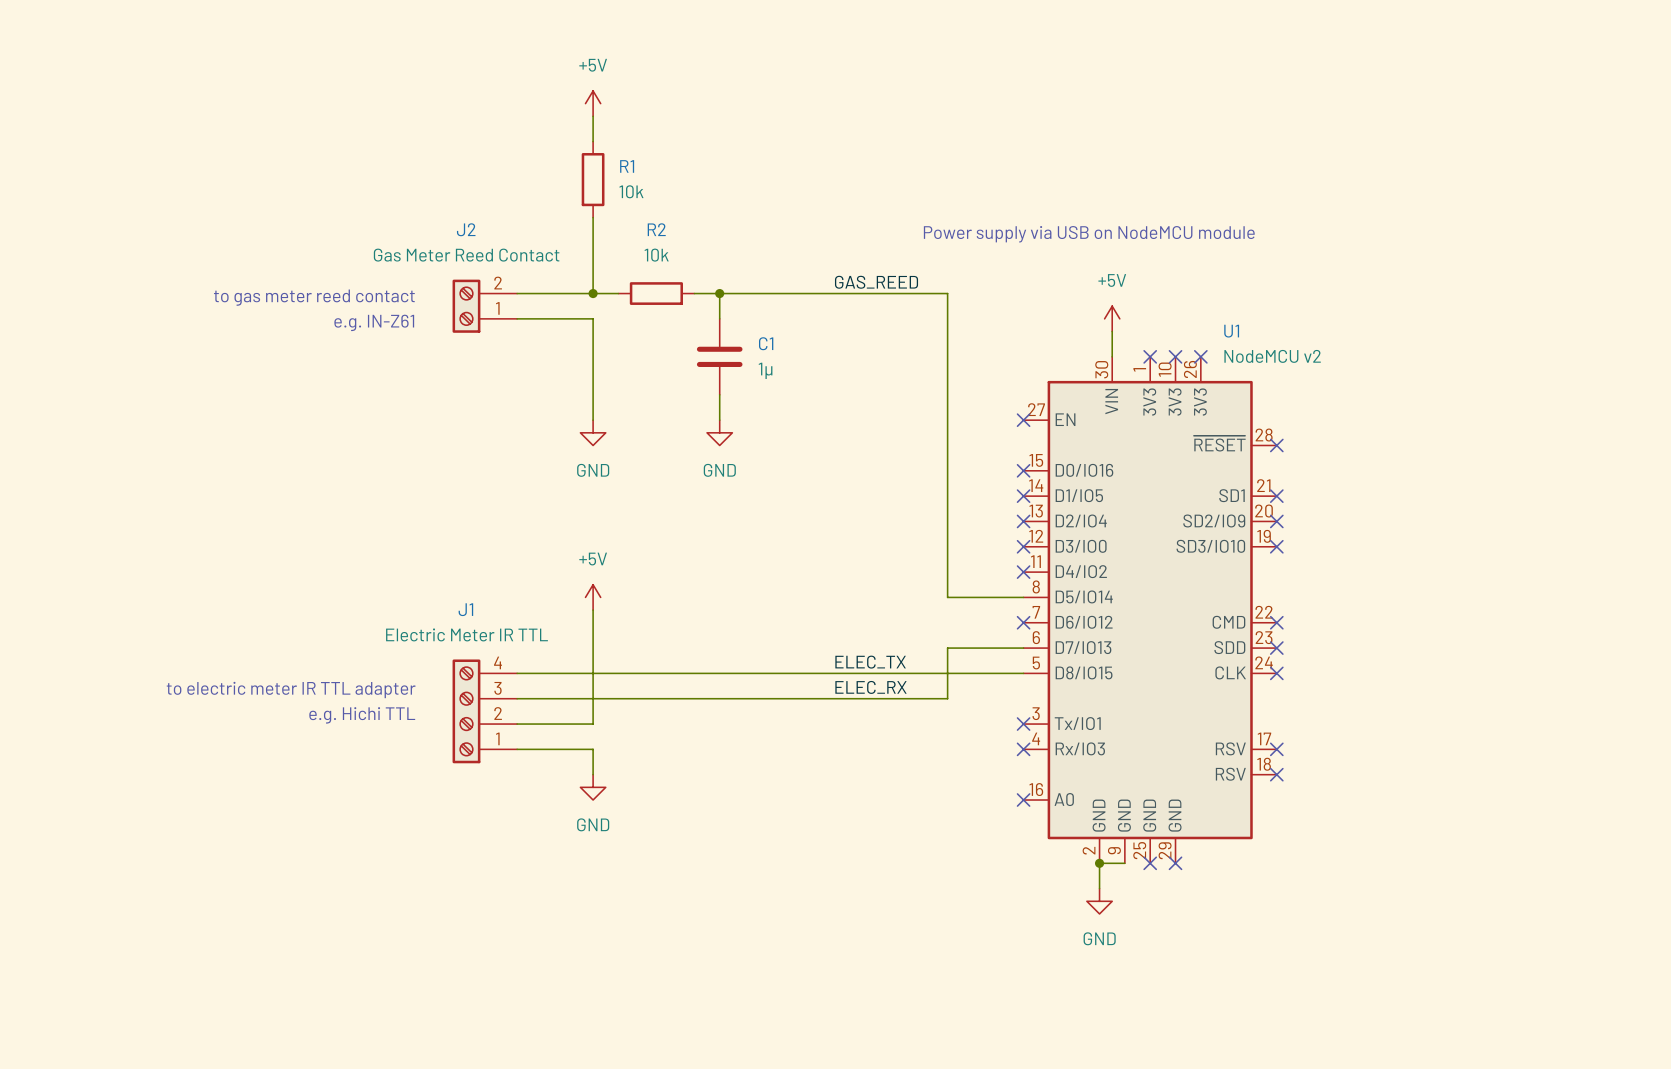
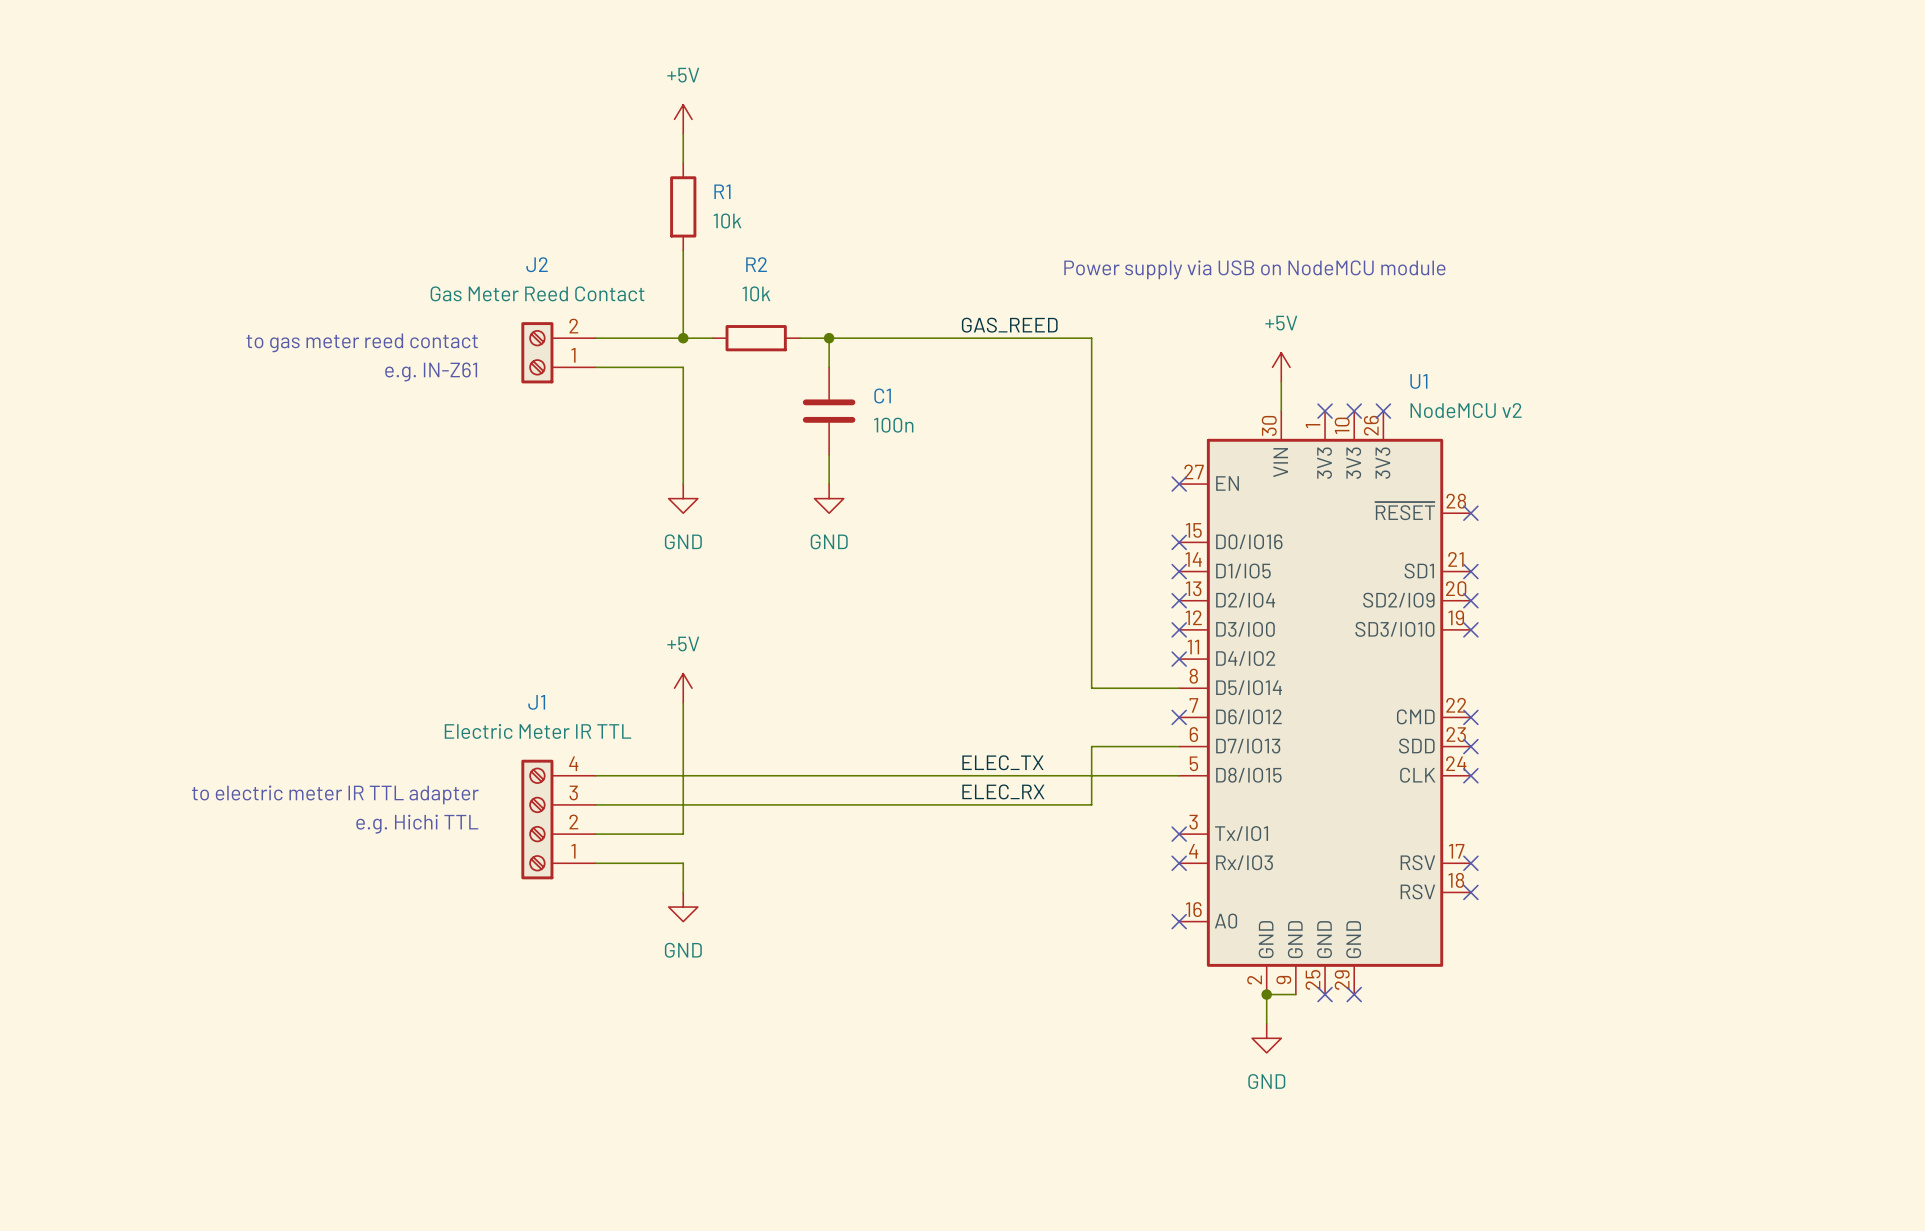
C1 value: 1µ (765, 370) -> 100n (893, 425)

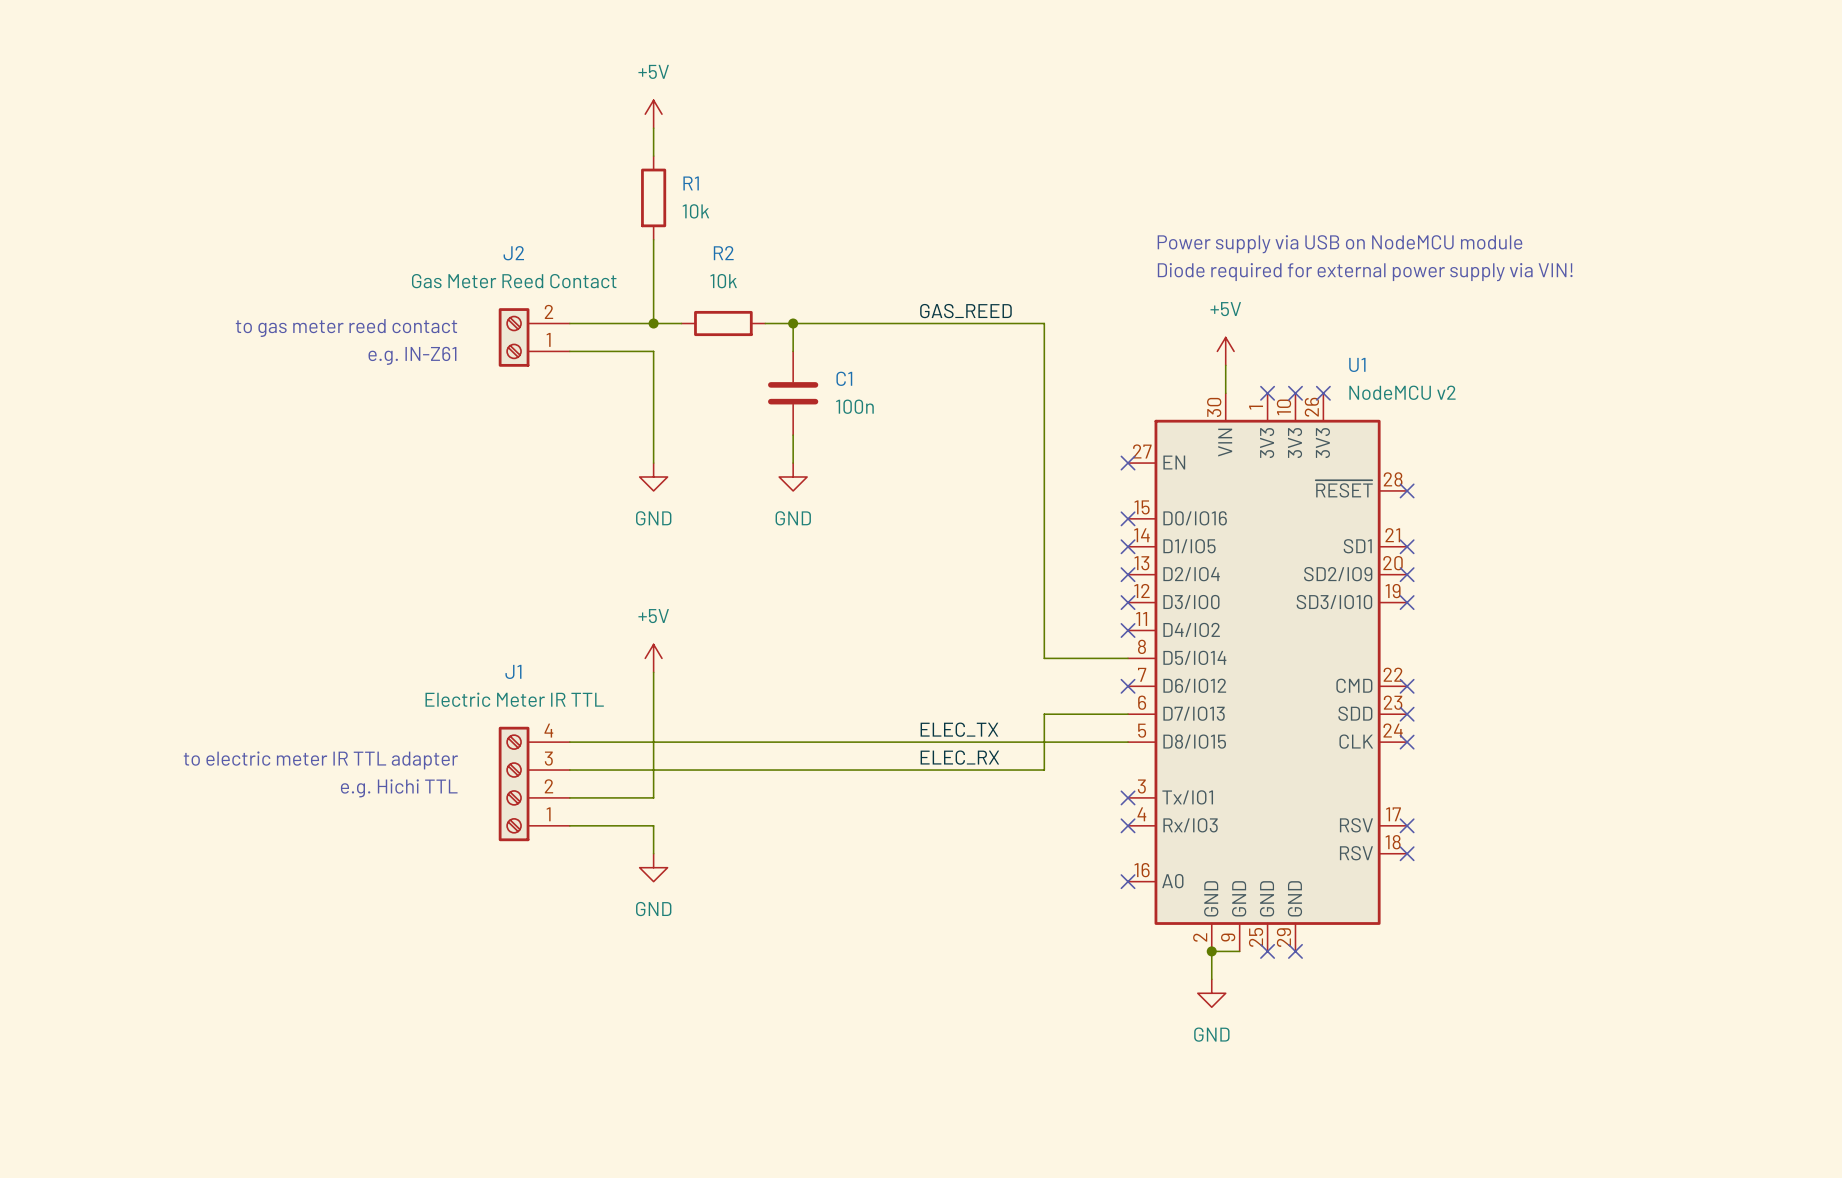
text position: Power supply via USB on NodeMCU module (1254, 269) -> Power supply via USB on NodeMCU module (1339, 244)
text: none -> Diode required for external power supply via VIN! (1365, 272)

